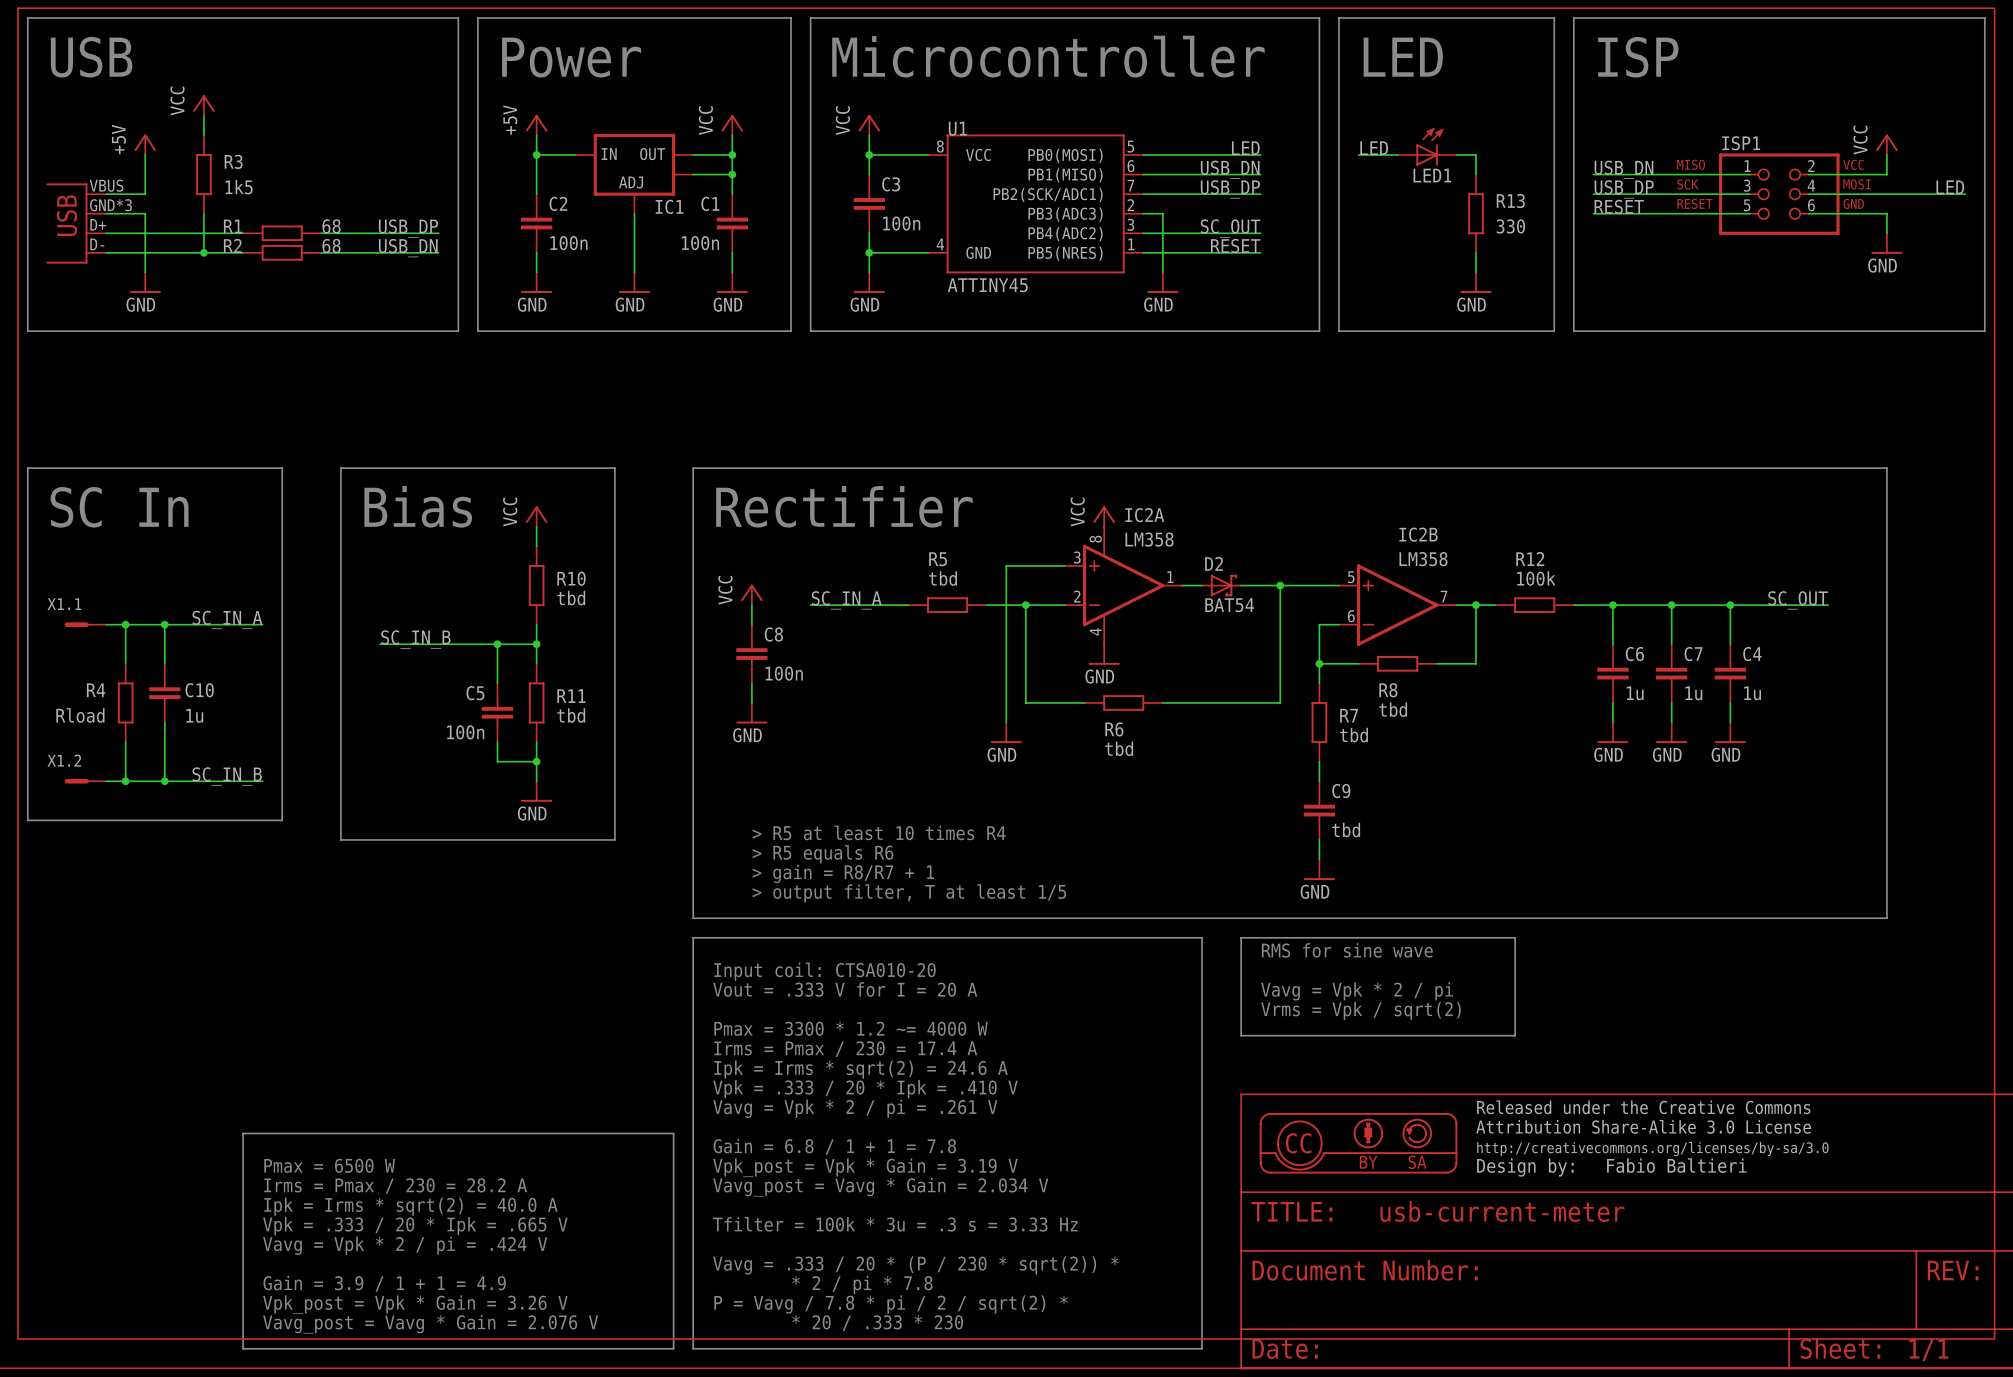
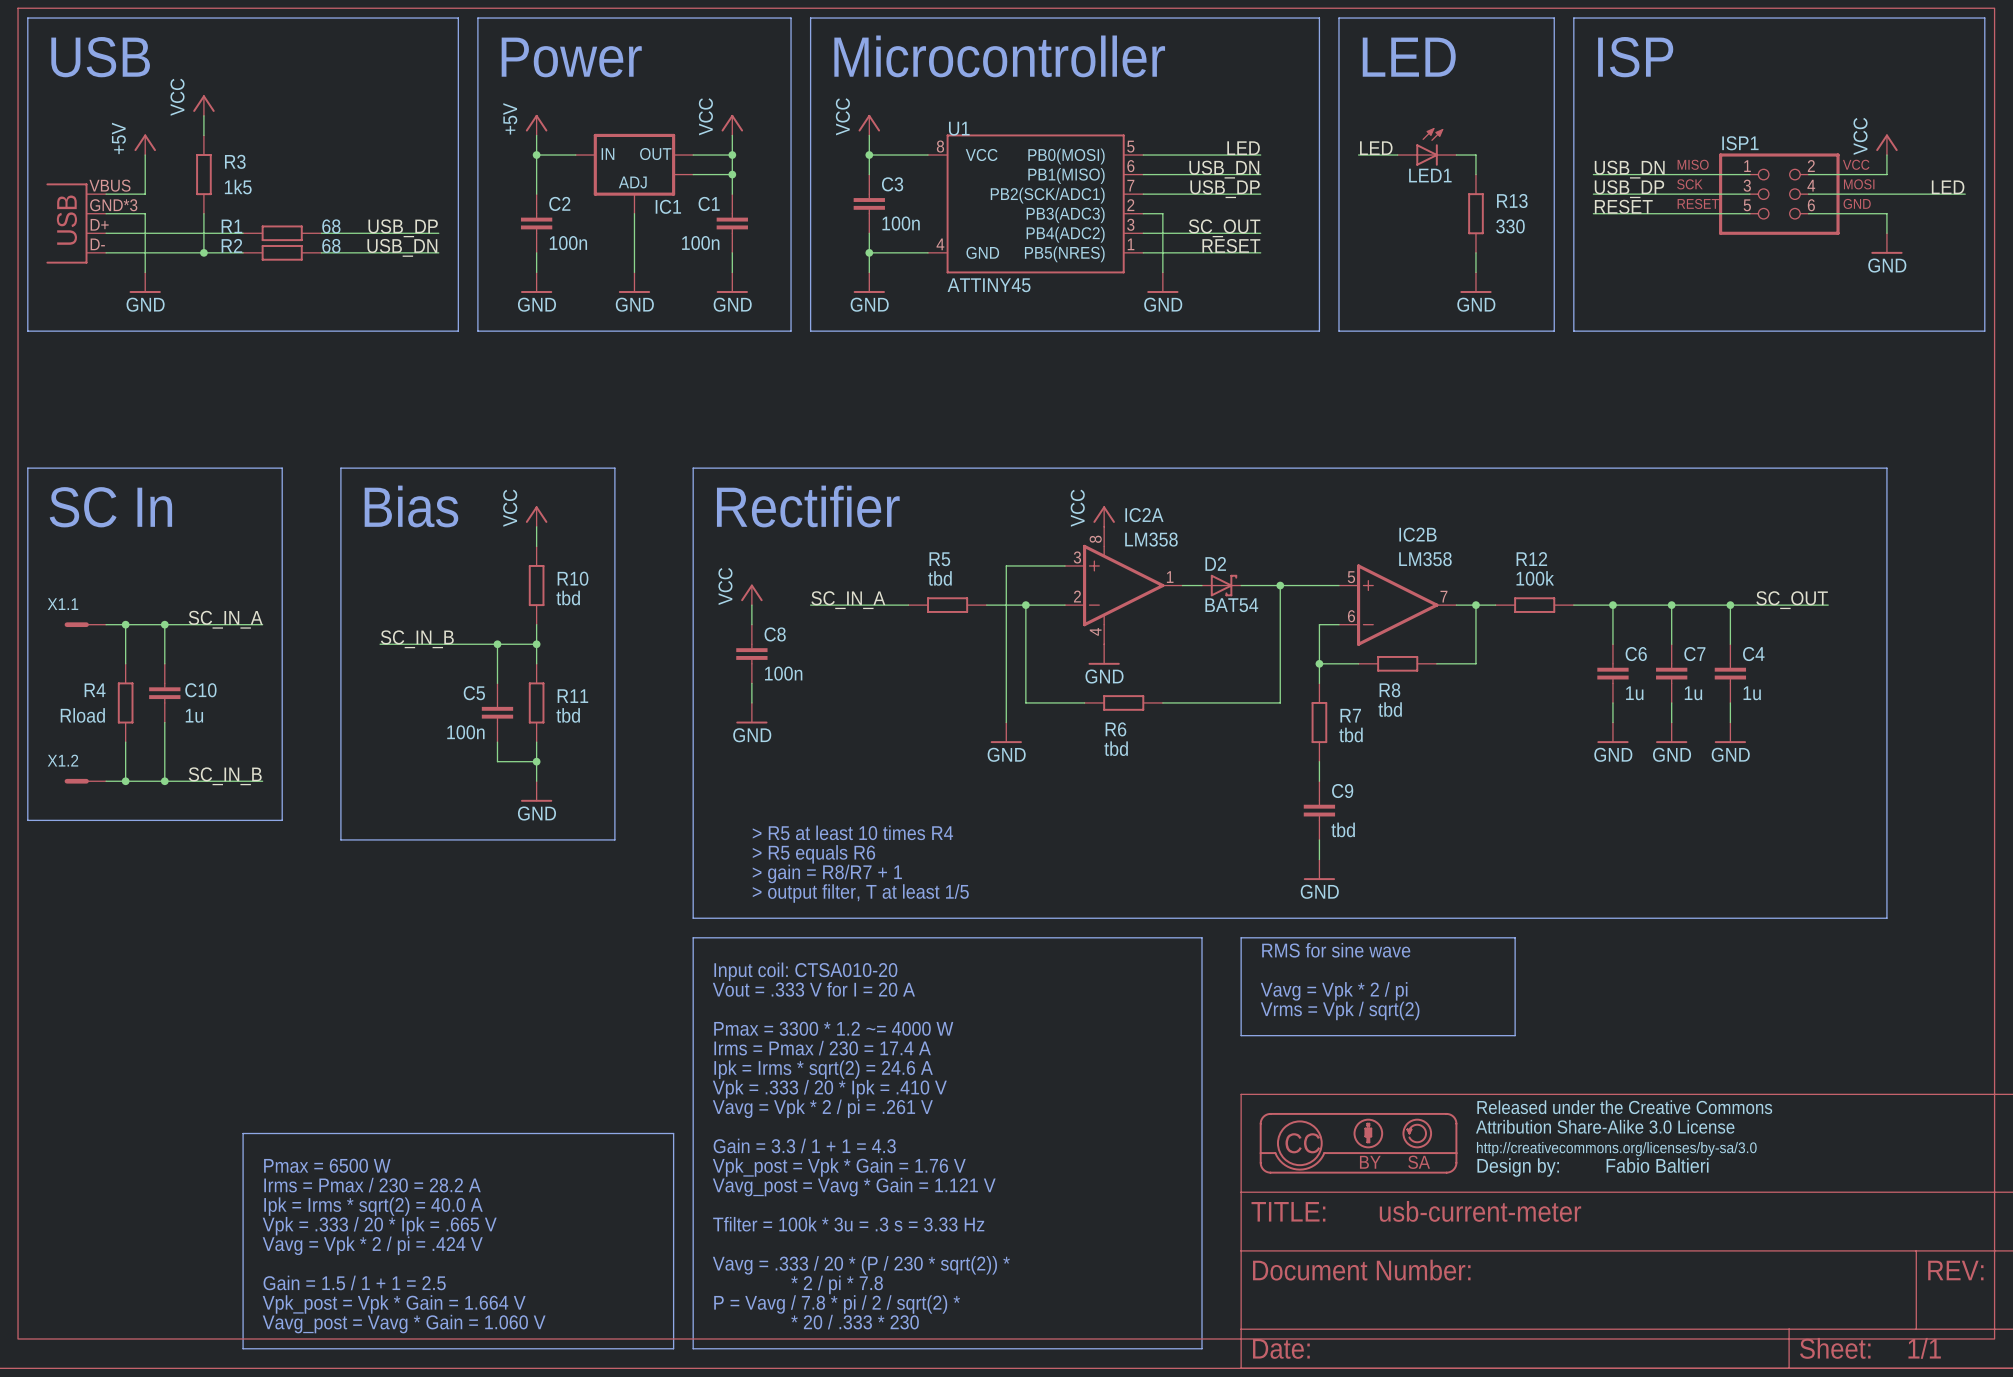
text: Gain = 6.8 / 1 + 1 = 7.8 (834, 1146) -> Gain = 3.3 / 1 + 1 = 4.3 (804, 1145)
text: Vpk_post = Vpk * Gain = 3.19 V (865, 1167) -> Vpk_post = Vpk * Gain = 1.76 V (839, 1167)
text: Vavg_post = Vavg * Gain = 2.034 V (880, 1187) -> Vavg_post = Vavg * Gain = 1.121 V (854, 1187)
text: Gain = 3.9 / 1 + 1 = 4.9 (384, 1283) -> Gain = 1.5 / 1 + 1 = 2.5 (354, 1282)
text: Vpk_post = Vpk * Gain = 3.26 V (415, 1304) -> Vpk_post = Vpk * Gain = 1.664 V (394, 1304)
text: Vavg_post = Vavg * Gain = 2.076 V (430, 1324) -> Vavg_post = Vavg * Gain = 1.060 V (404, 1324)

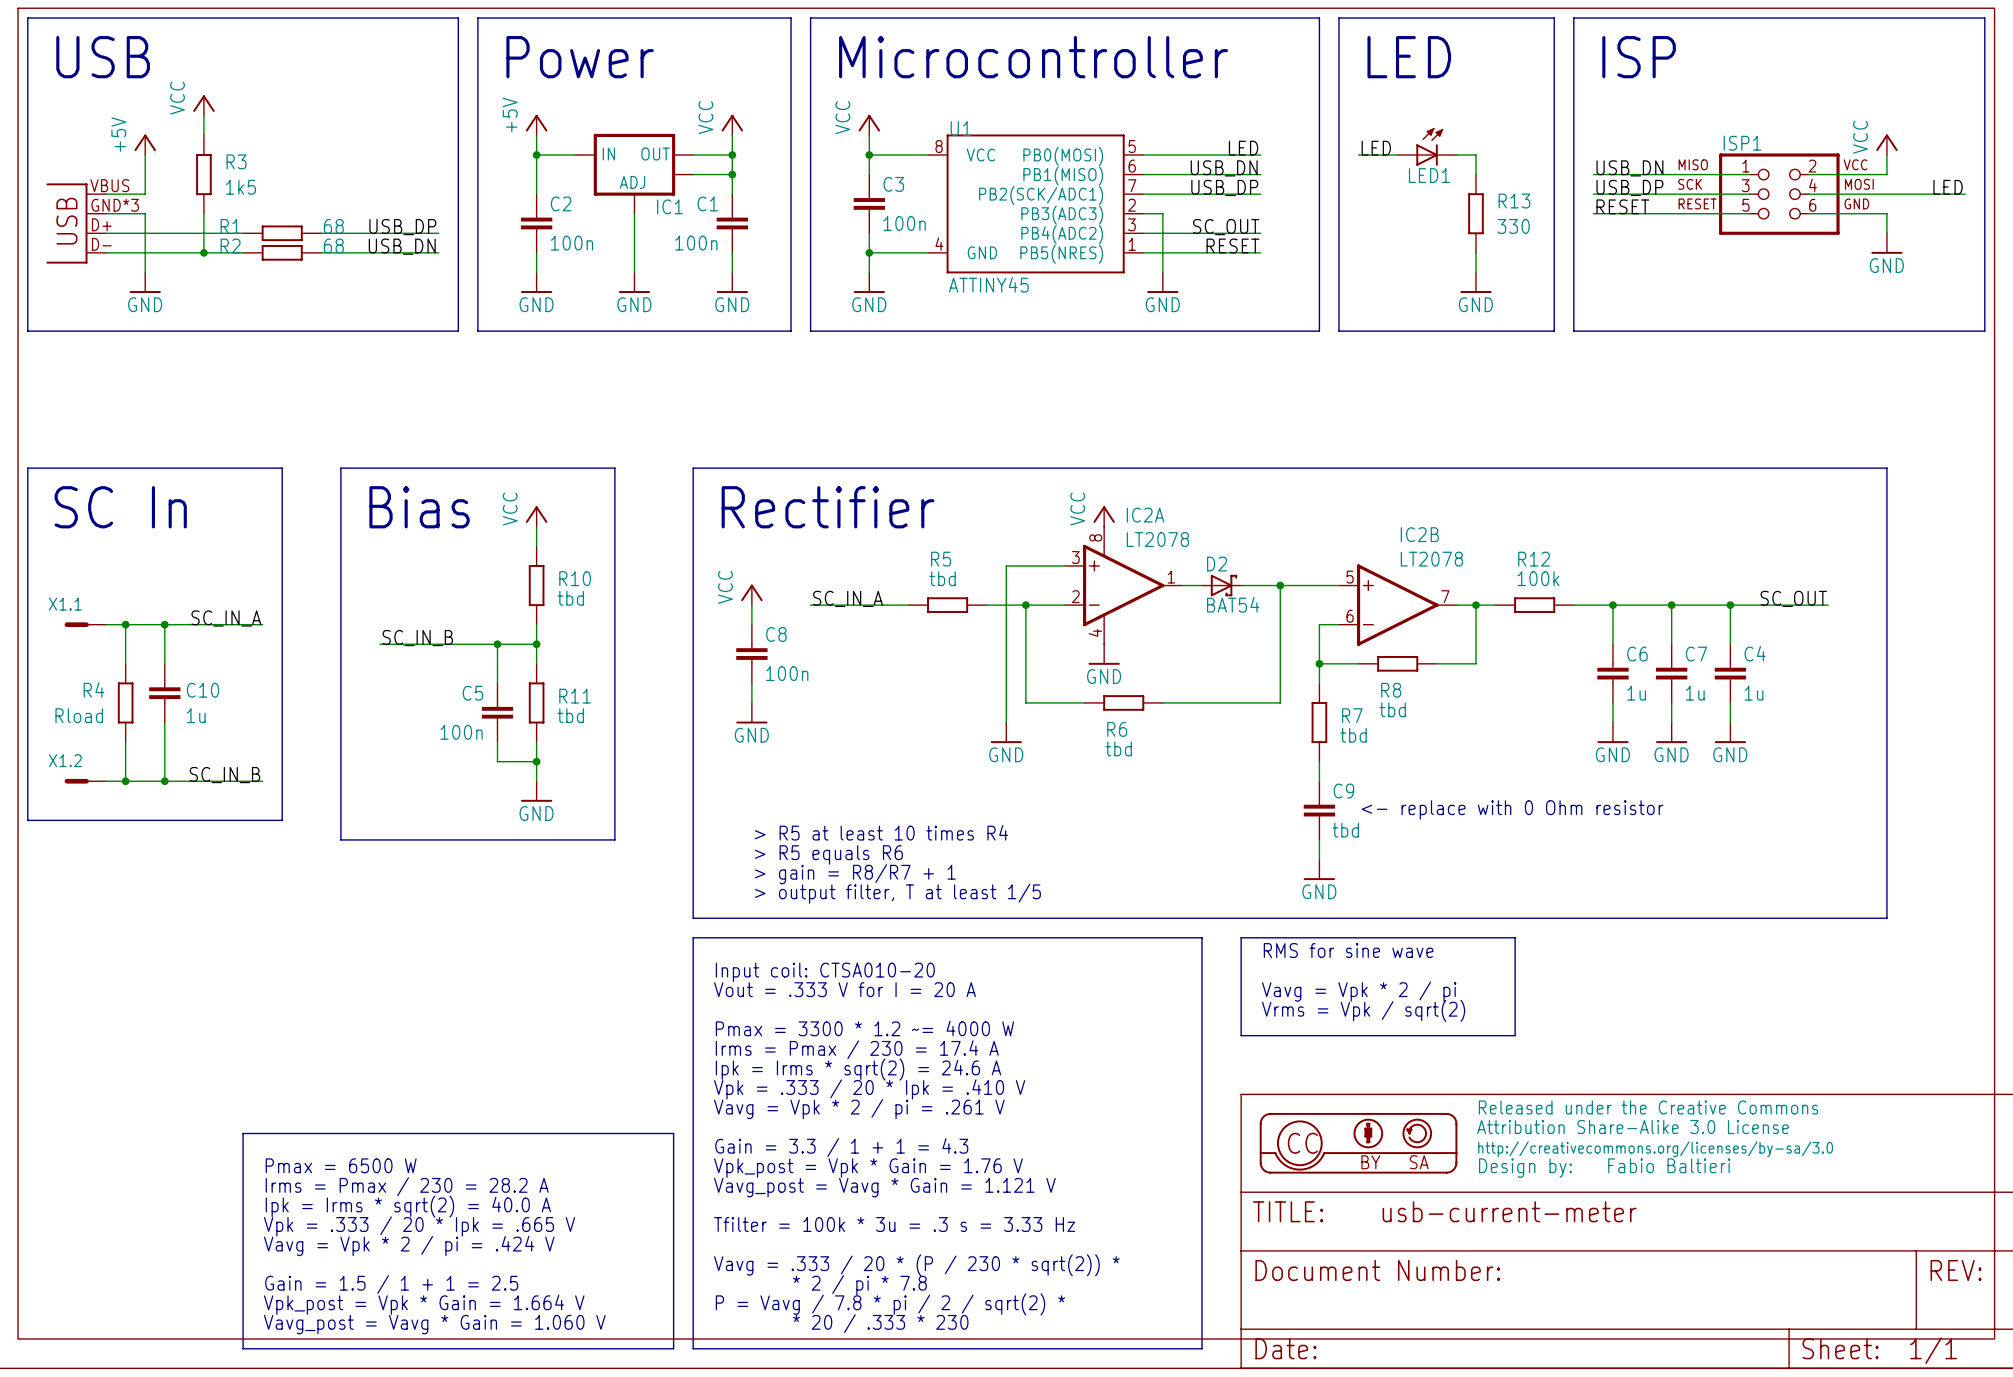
IC2A value: LM358 (1151, 539) -> LT2078 (1157, 539)
IC2B value: LM358 (1425, 559) -> LT2078 (1431, 559)
text: none -> <- replace with 0 Ohm resistor (1512, 809)

